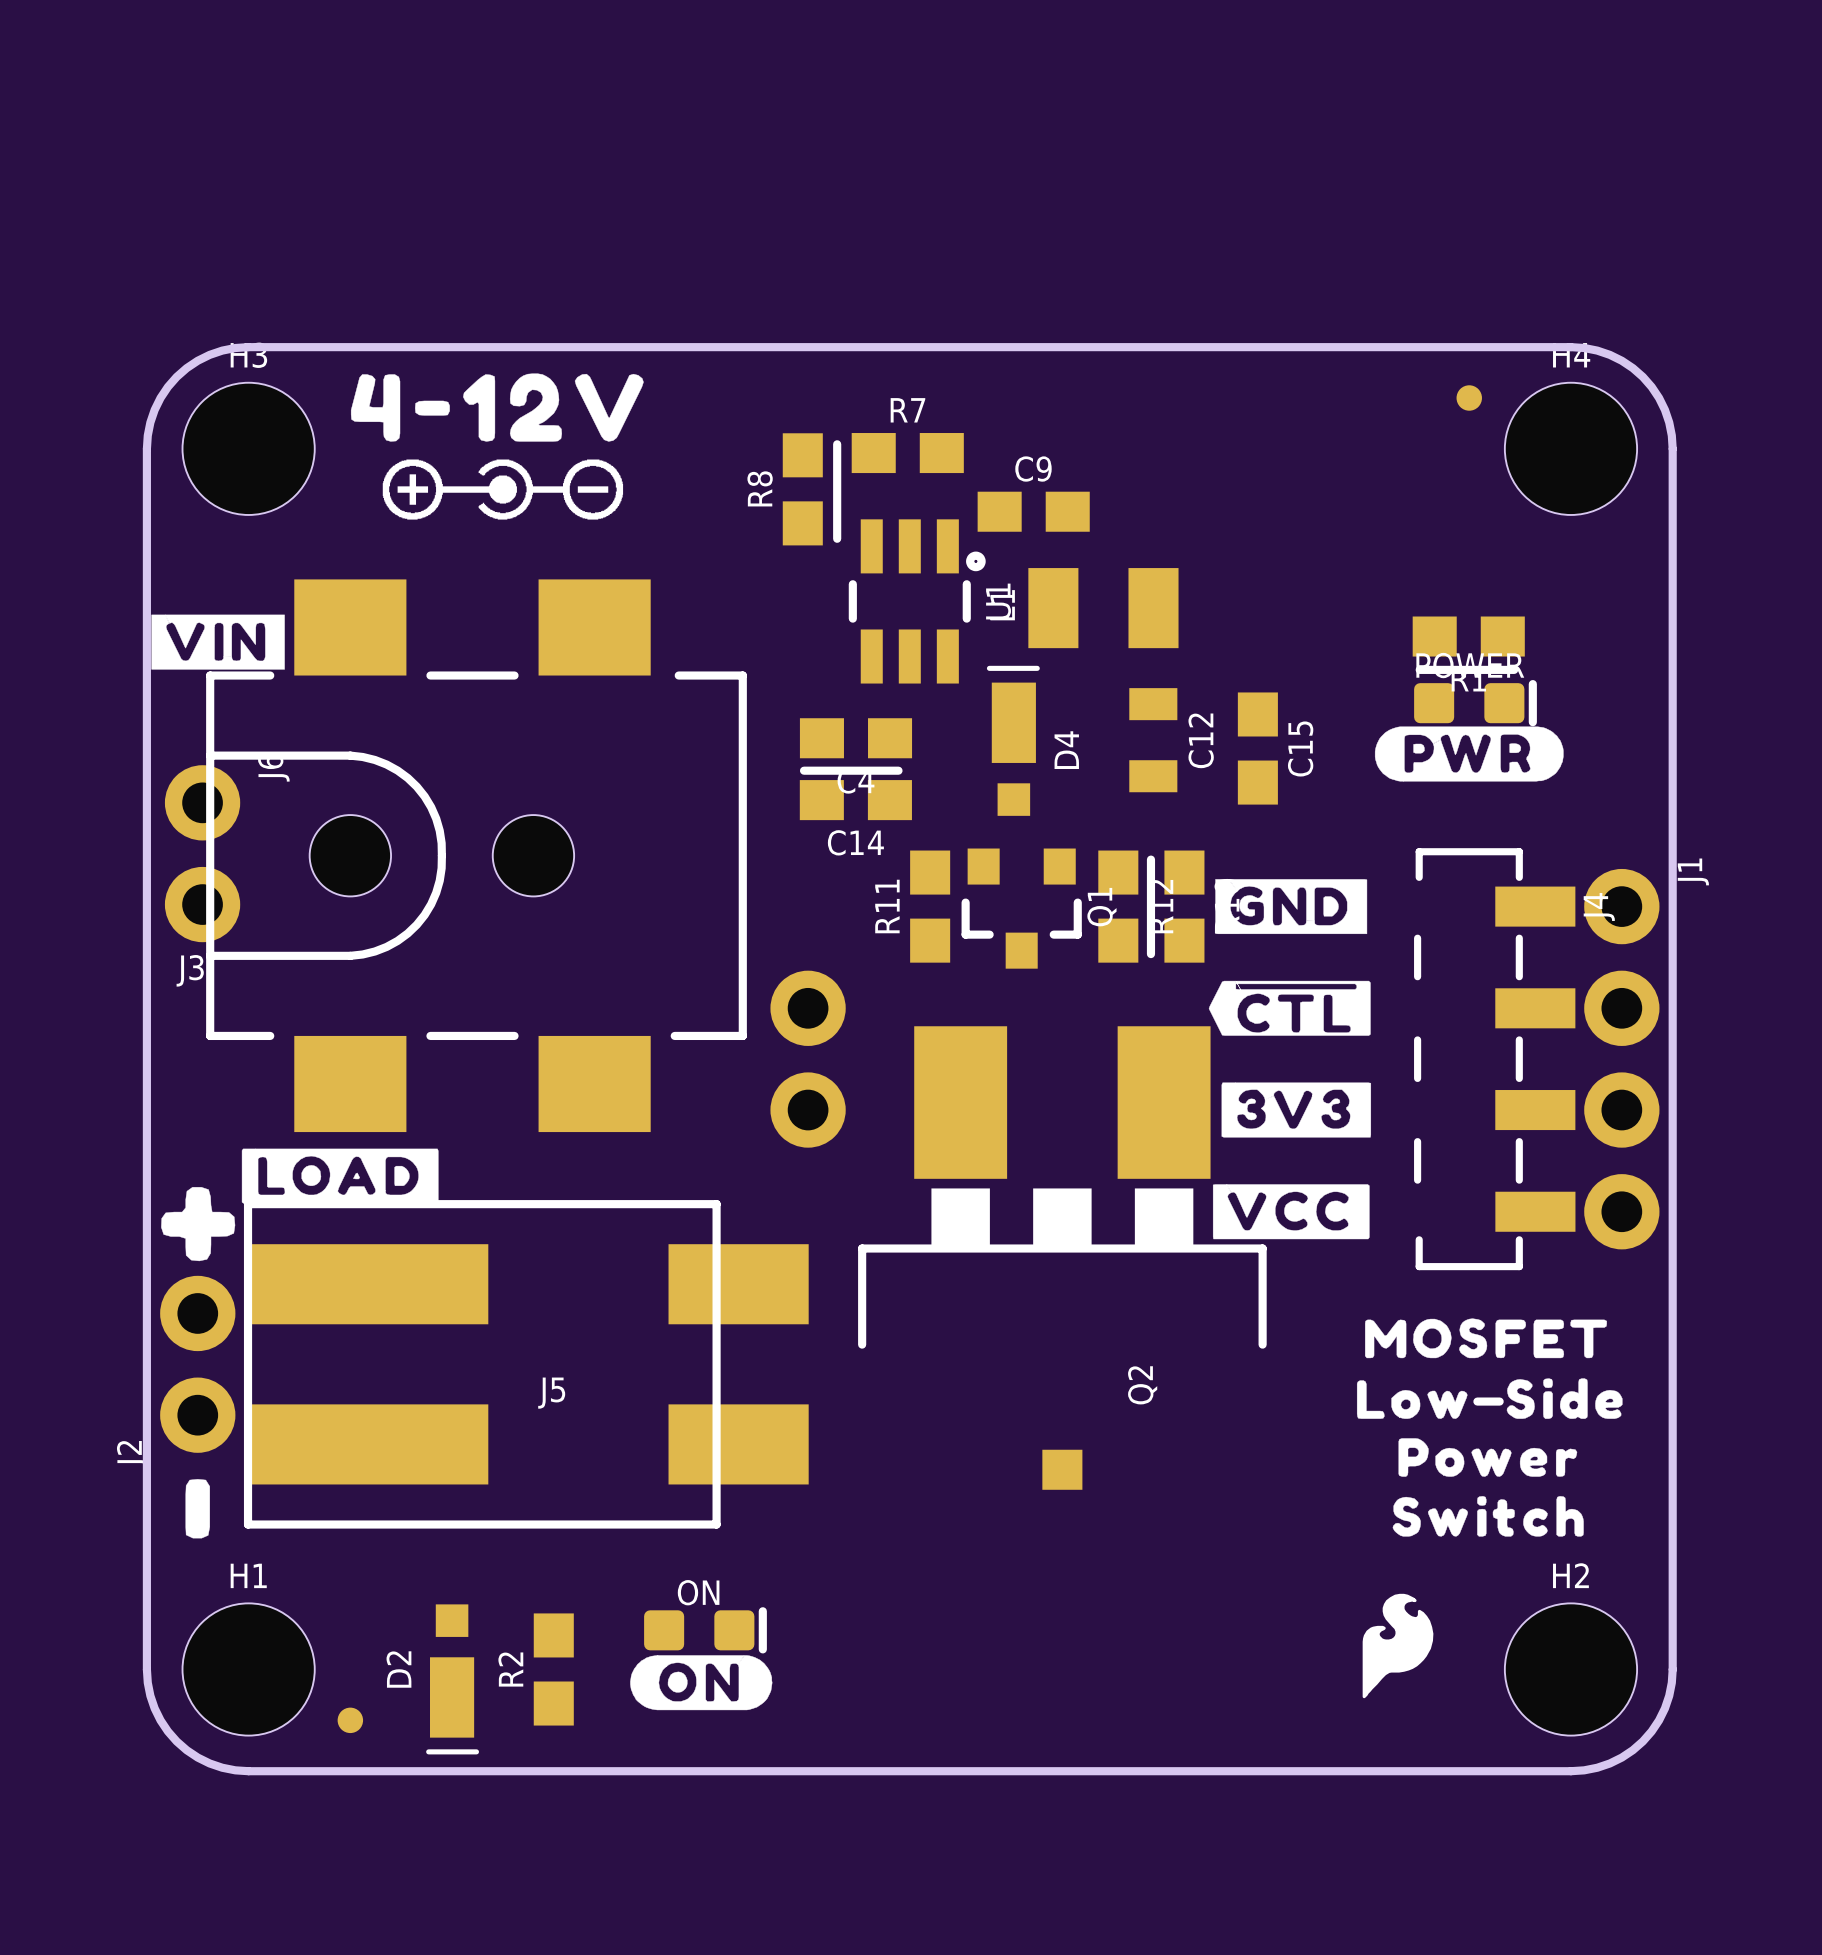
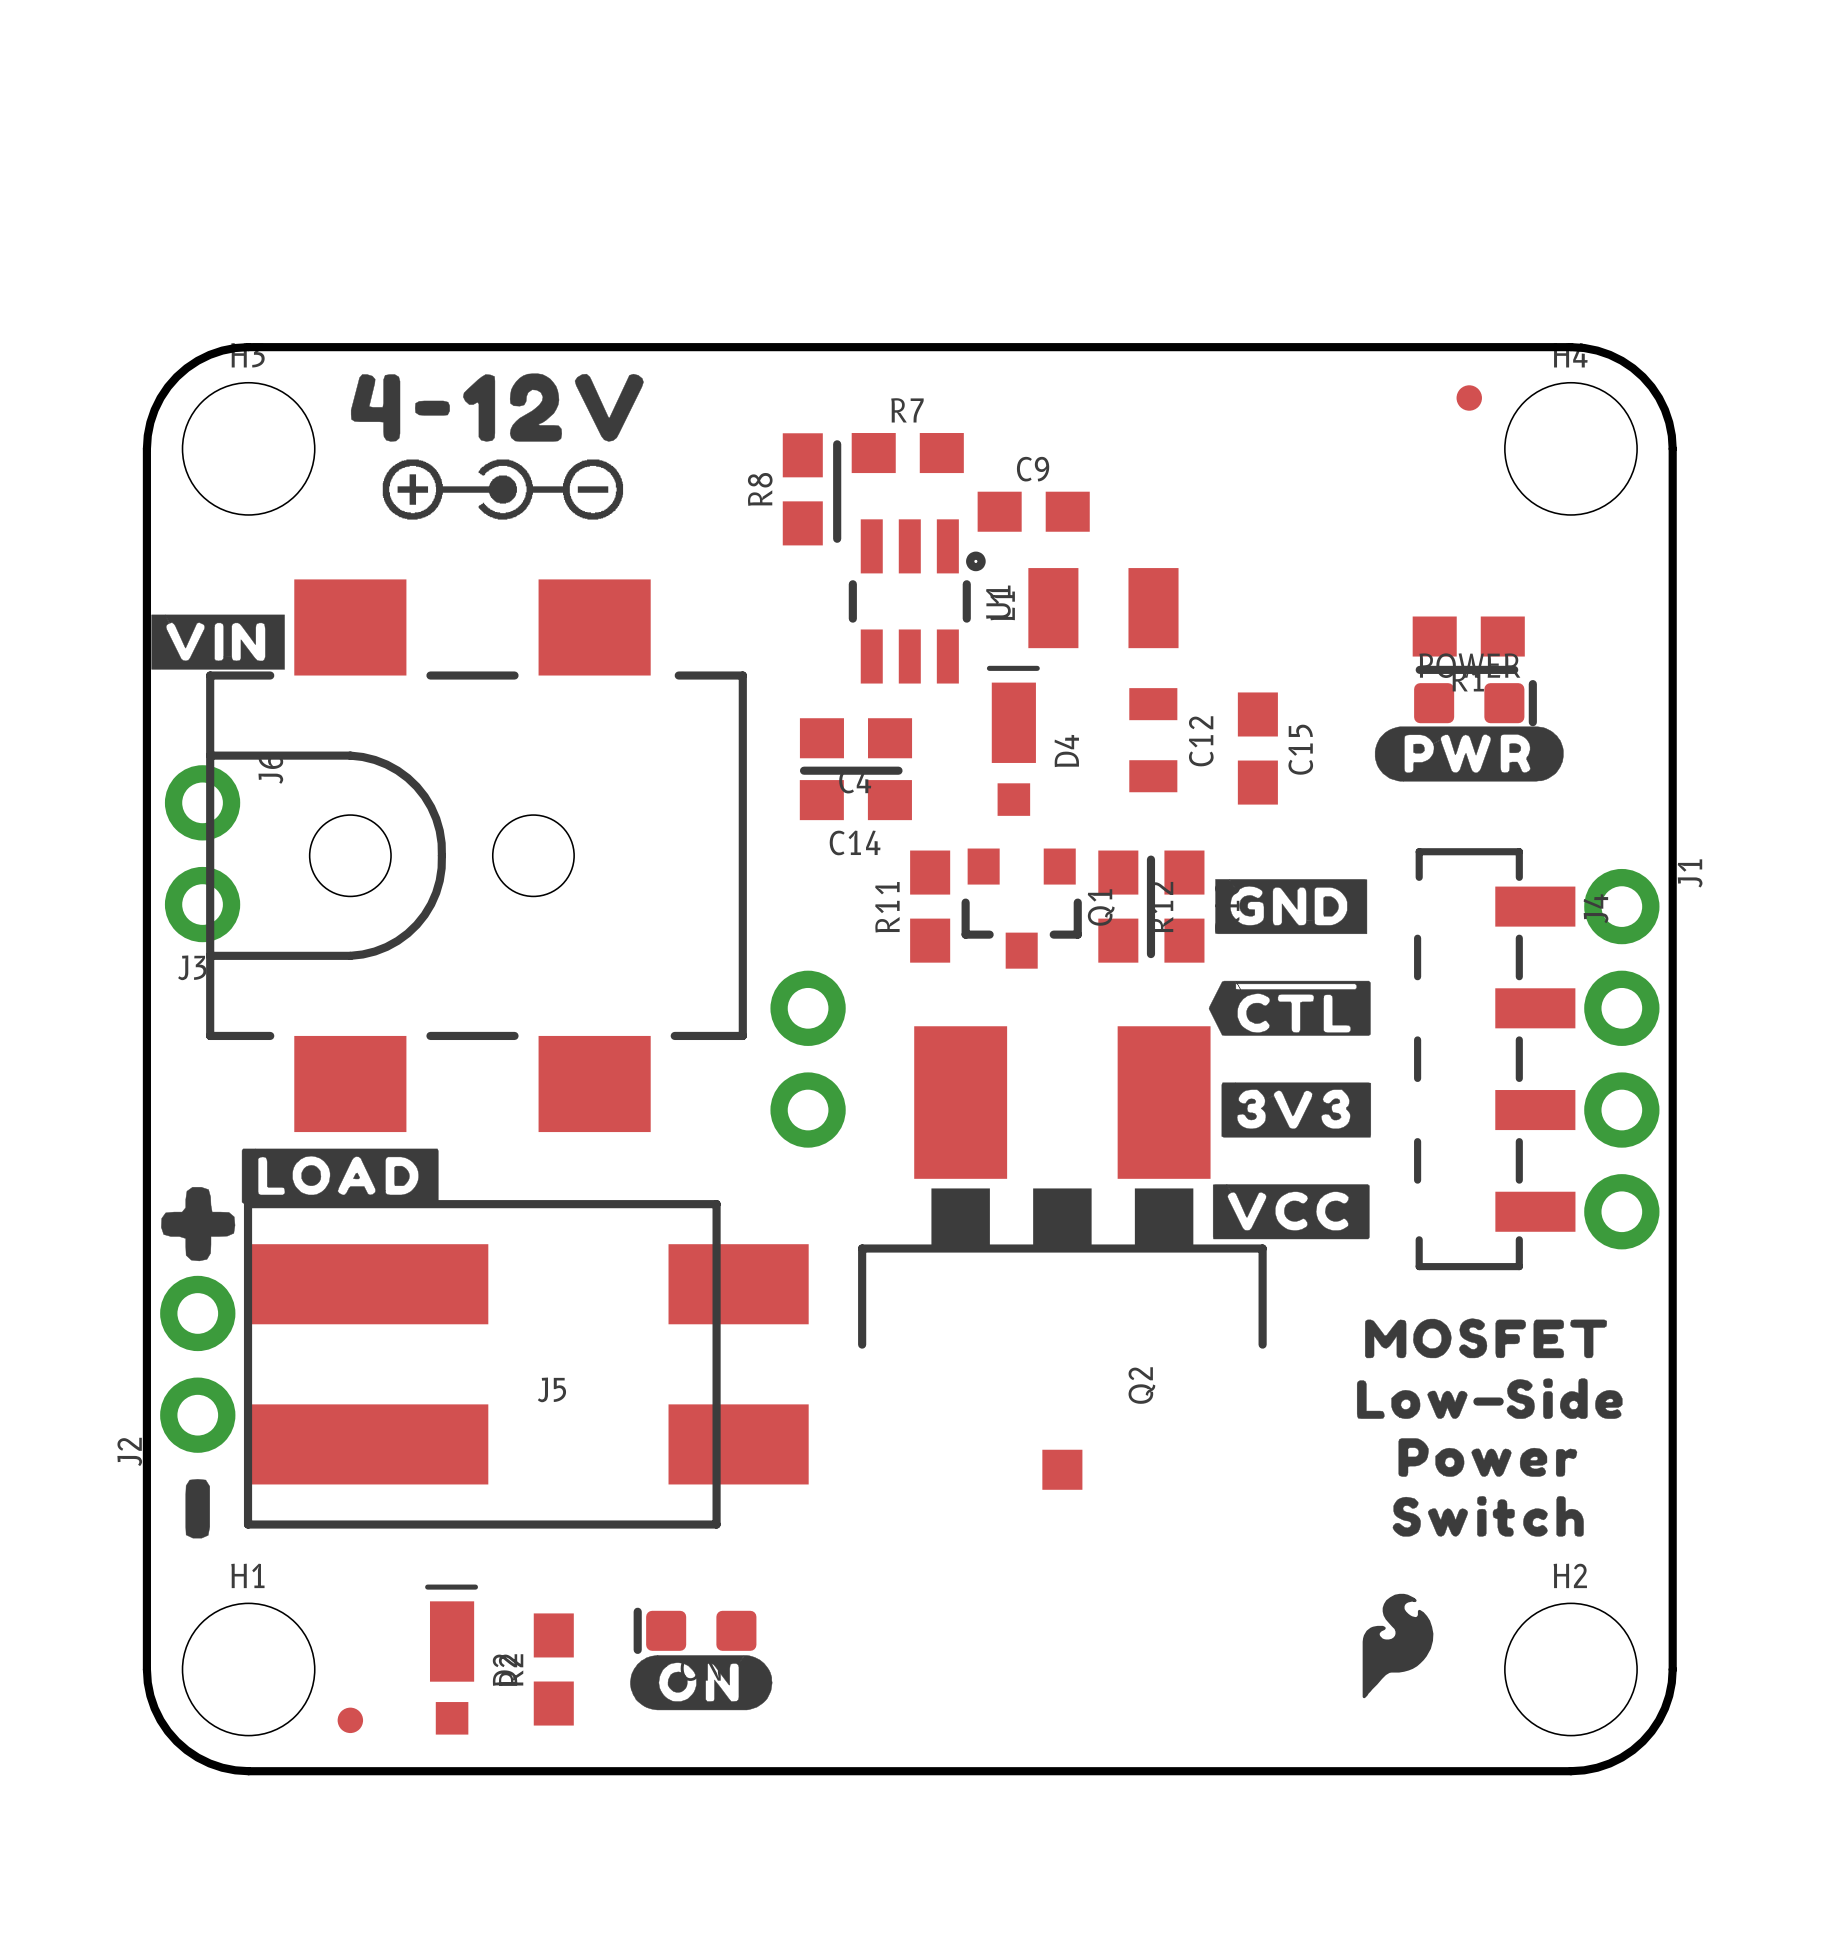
ON rotation: 0° (705, 1630) -> 180° (695, 1630)
D2 rotation: 0° (452, 1679) -> 180° (451, 1659)

